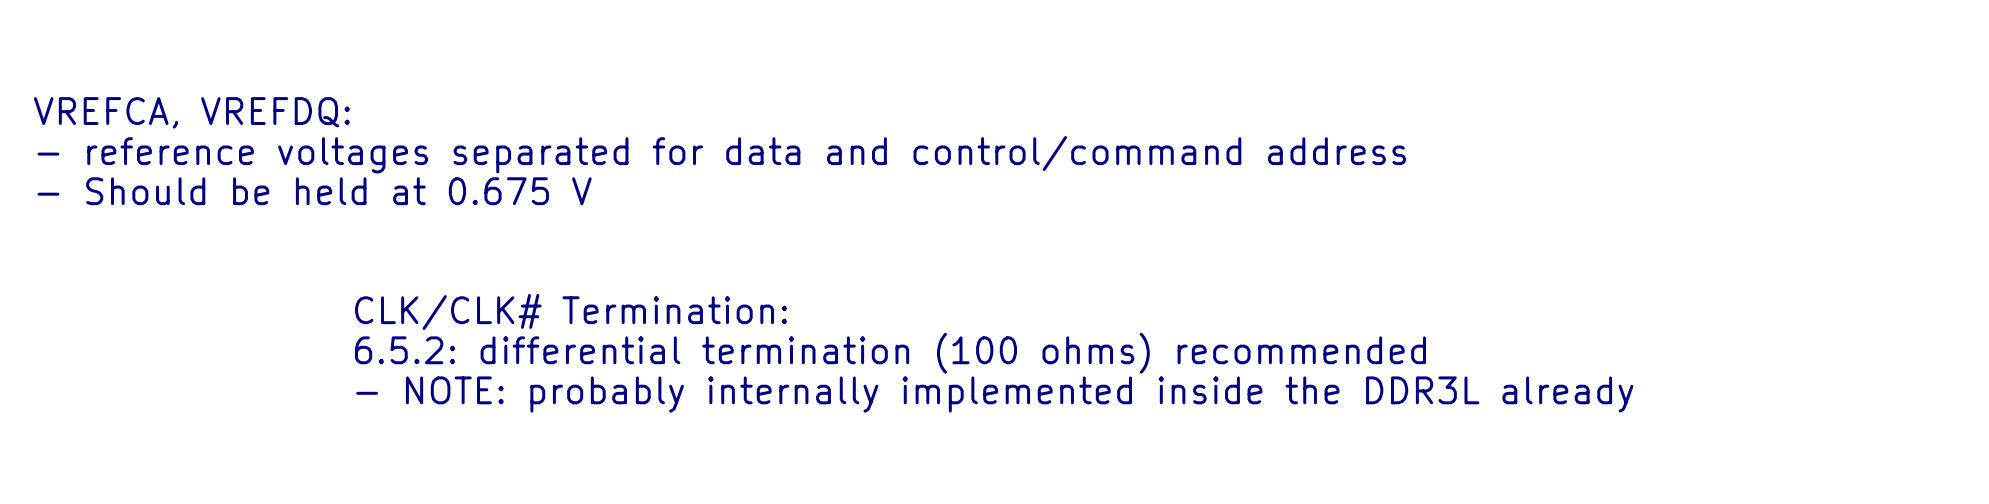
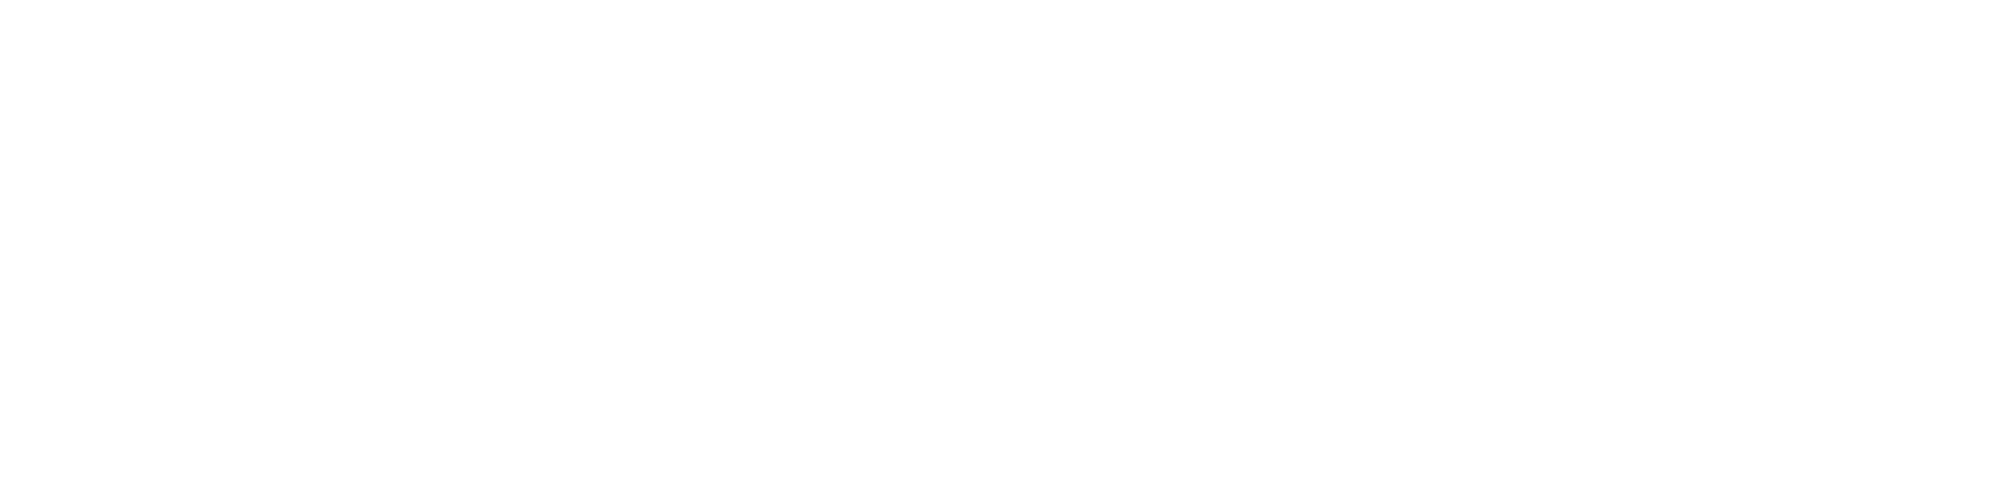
text: VREFCA, VREFDQ: (191, 112) -> none
text: - reference voltages separated for data and control/command address (721, 154) -> none
text: - Should be held at 0.675 V (314, 191) -> none
text: CLK/CLK# Termination: (571, 311) -> none
text: 6.5.2: differential termination (100 ohms) recommended (890, 353) -> none
text: - NOTE: probably internally implemented inside the DDR3L already (994, 394) -> none

